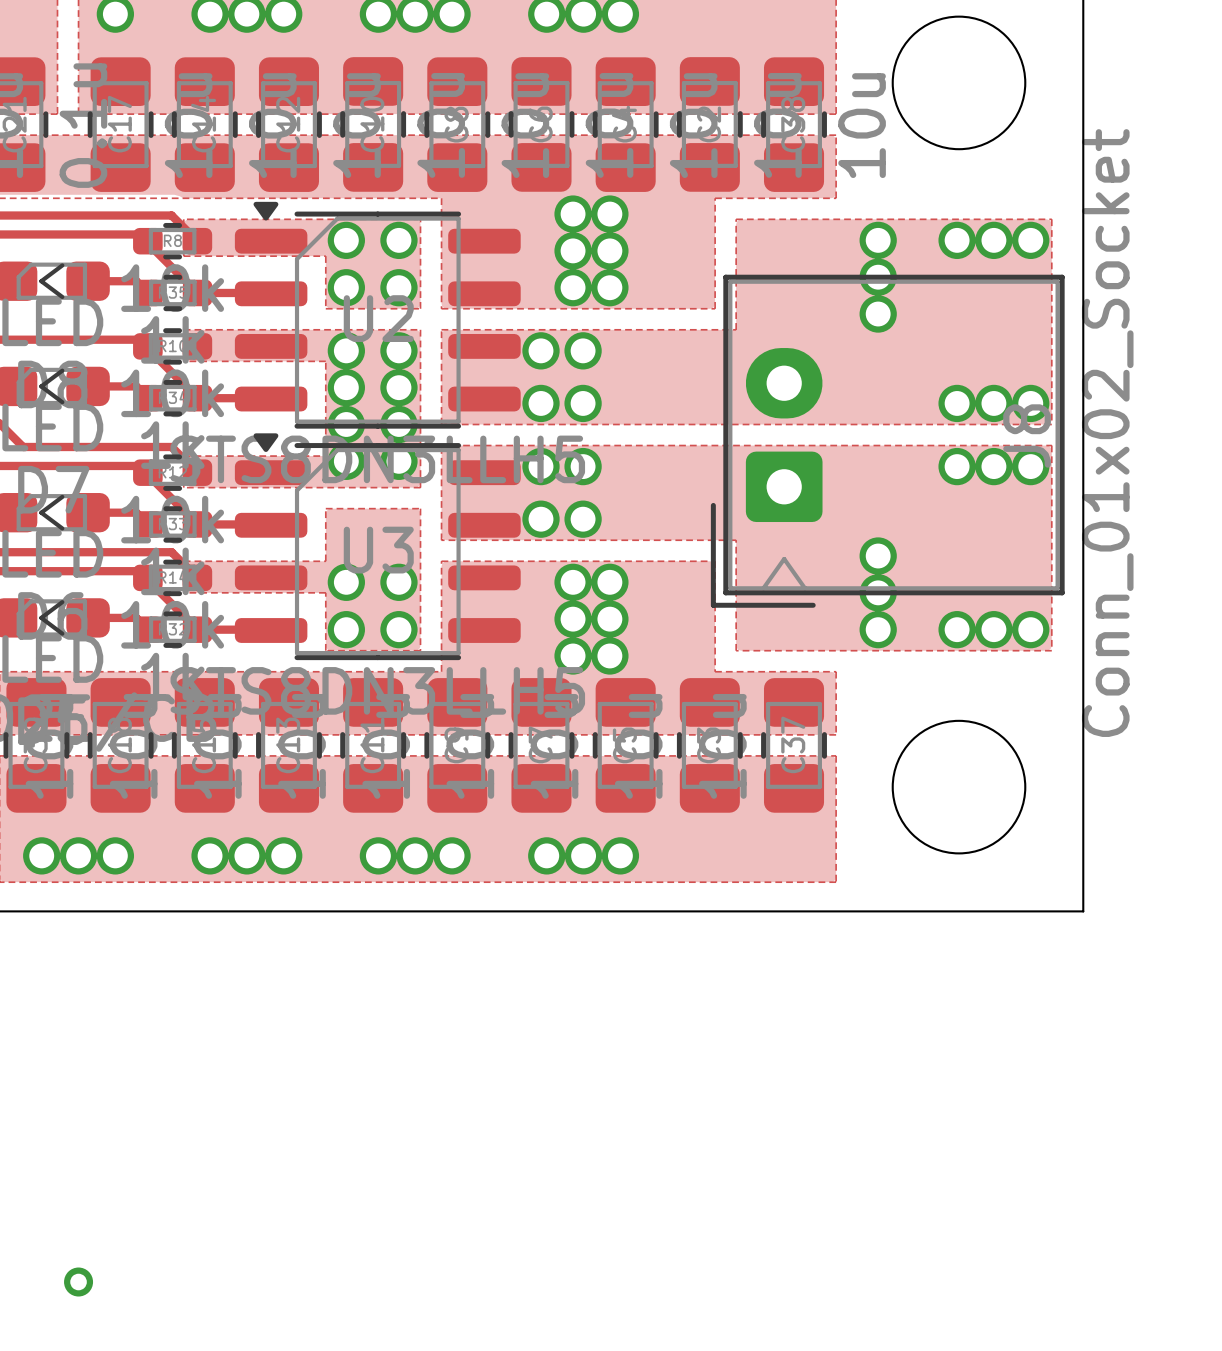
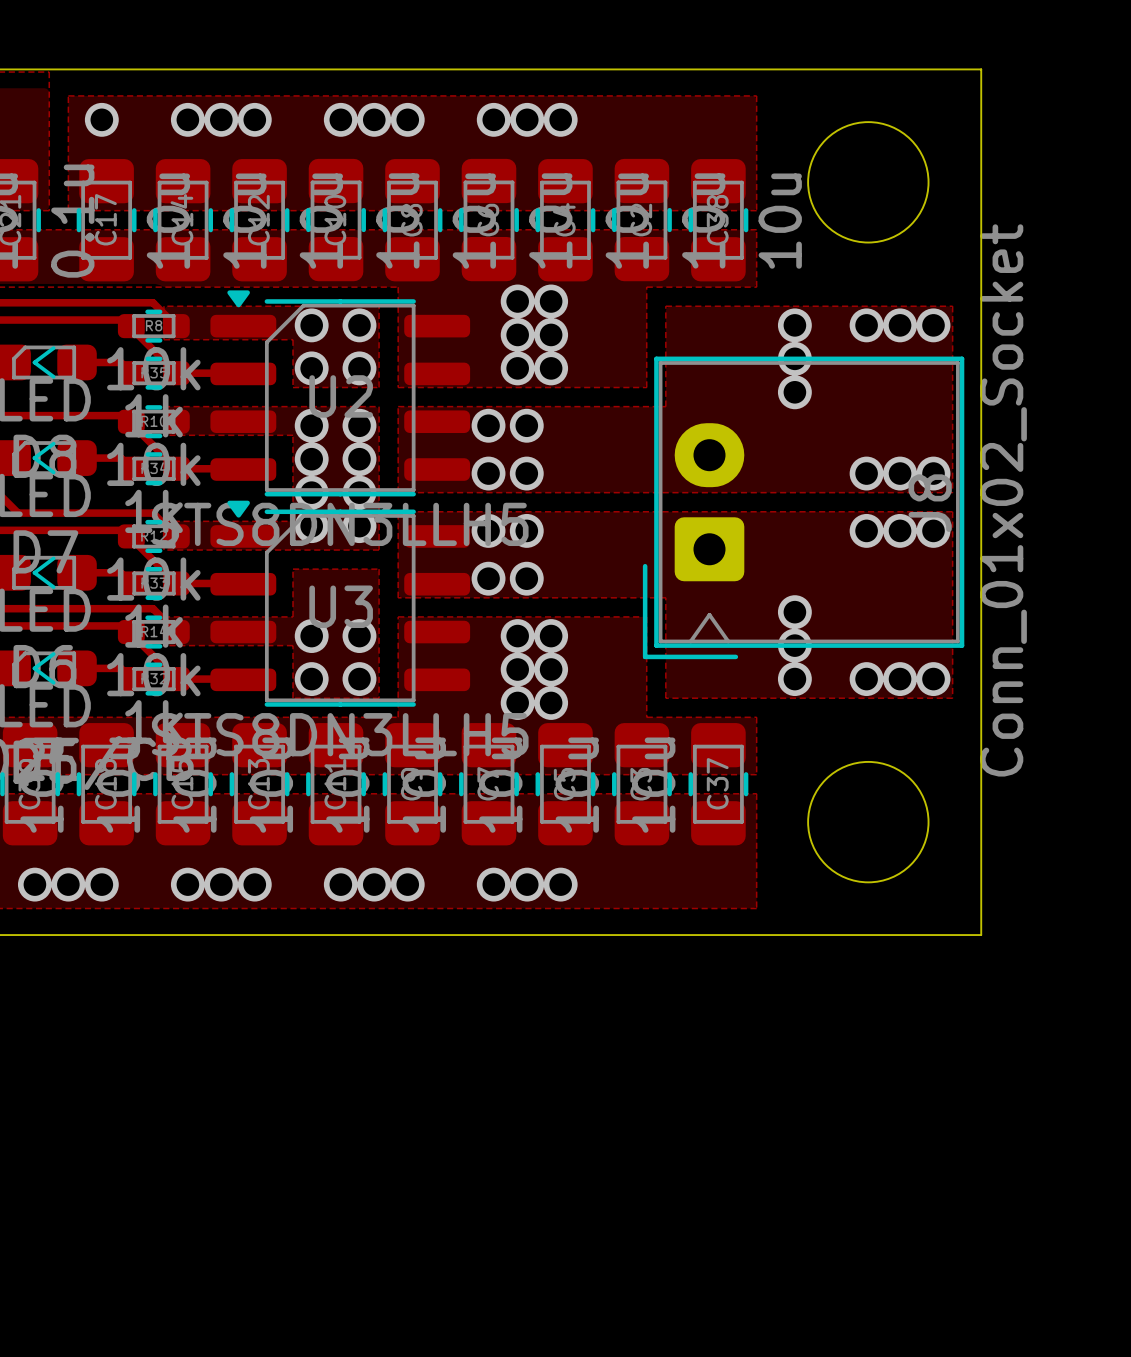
via: (78, 1282) -> none

